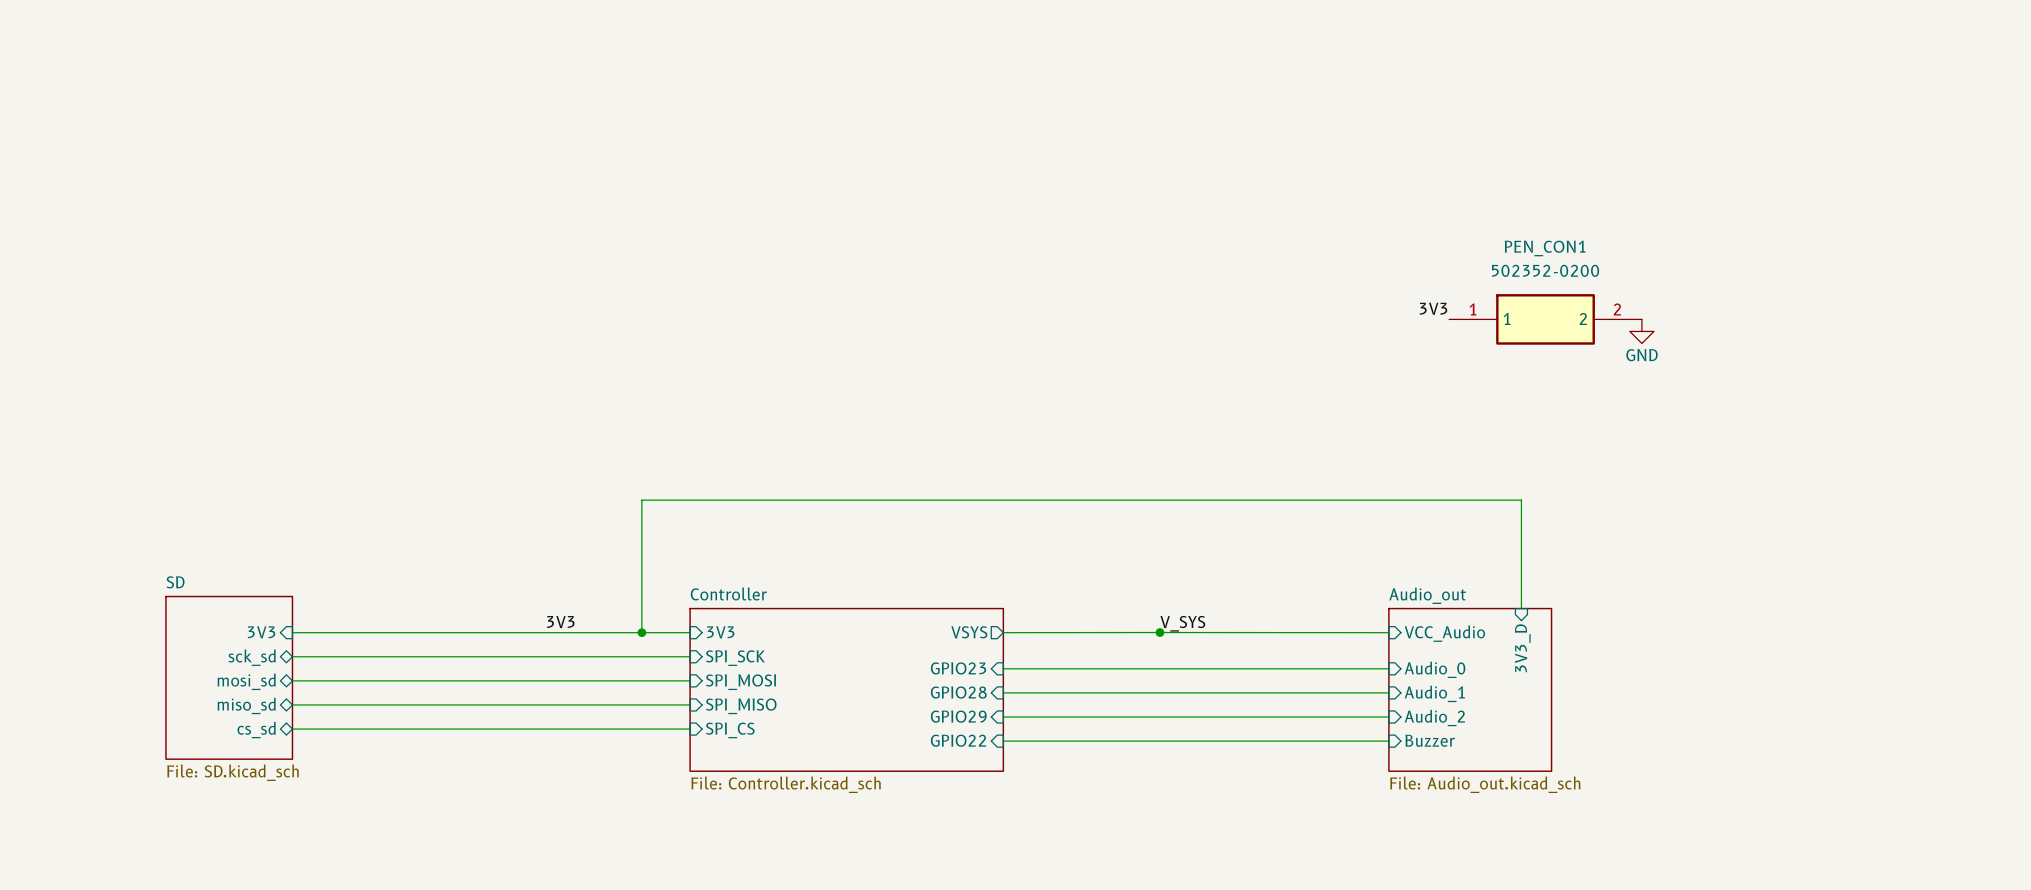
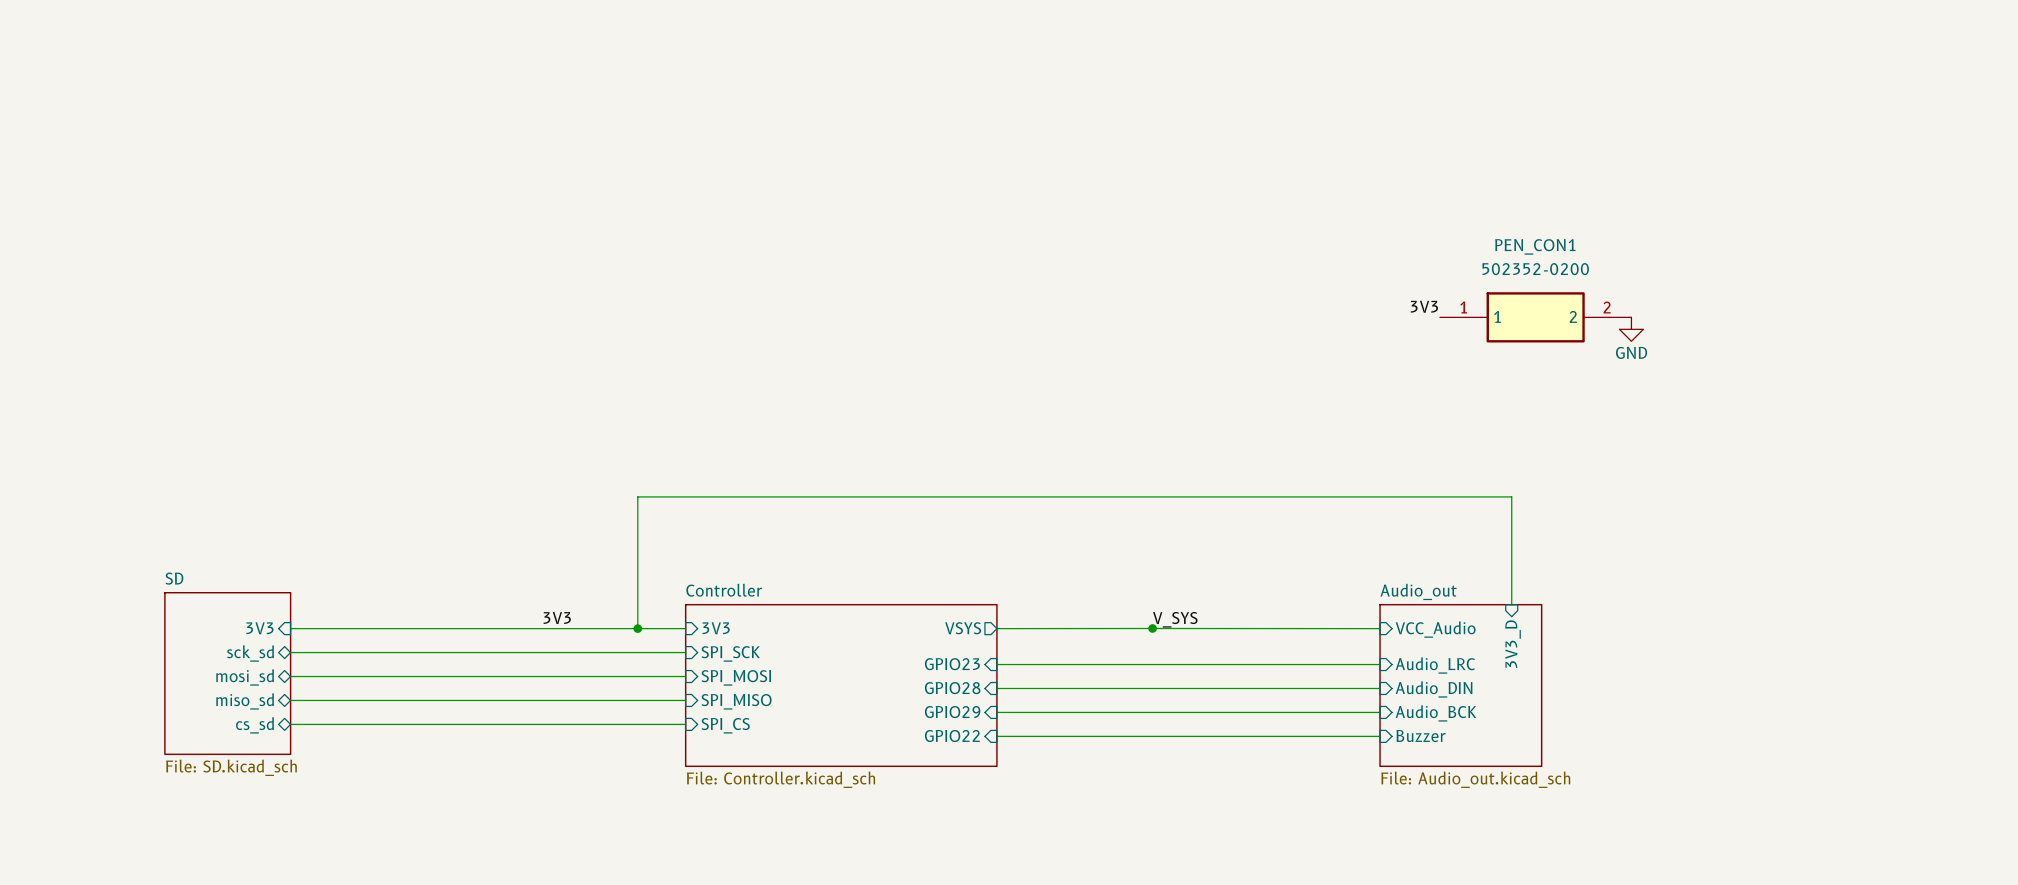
sheet pin: Audio_0 (1435, 669) -> Audio_LRC (1435, 665)
sheet pin: Audio_1 (1434, 693) -> Audio_DIN (1434, 689)
sheet pin: Audio_2 (1434, 717) -> Audio_BCK (1436, 713)

